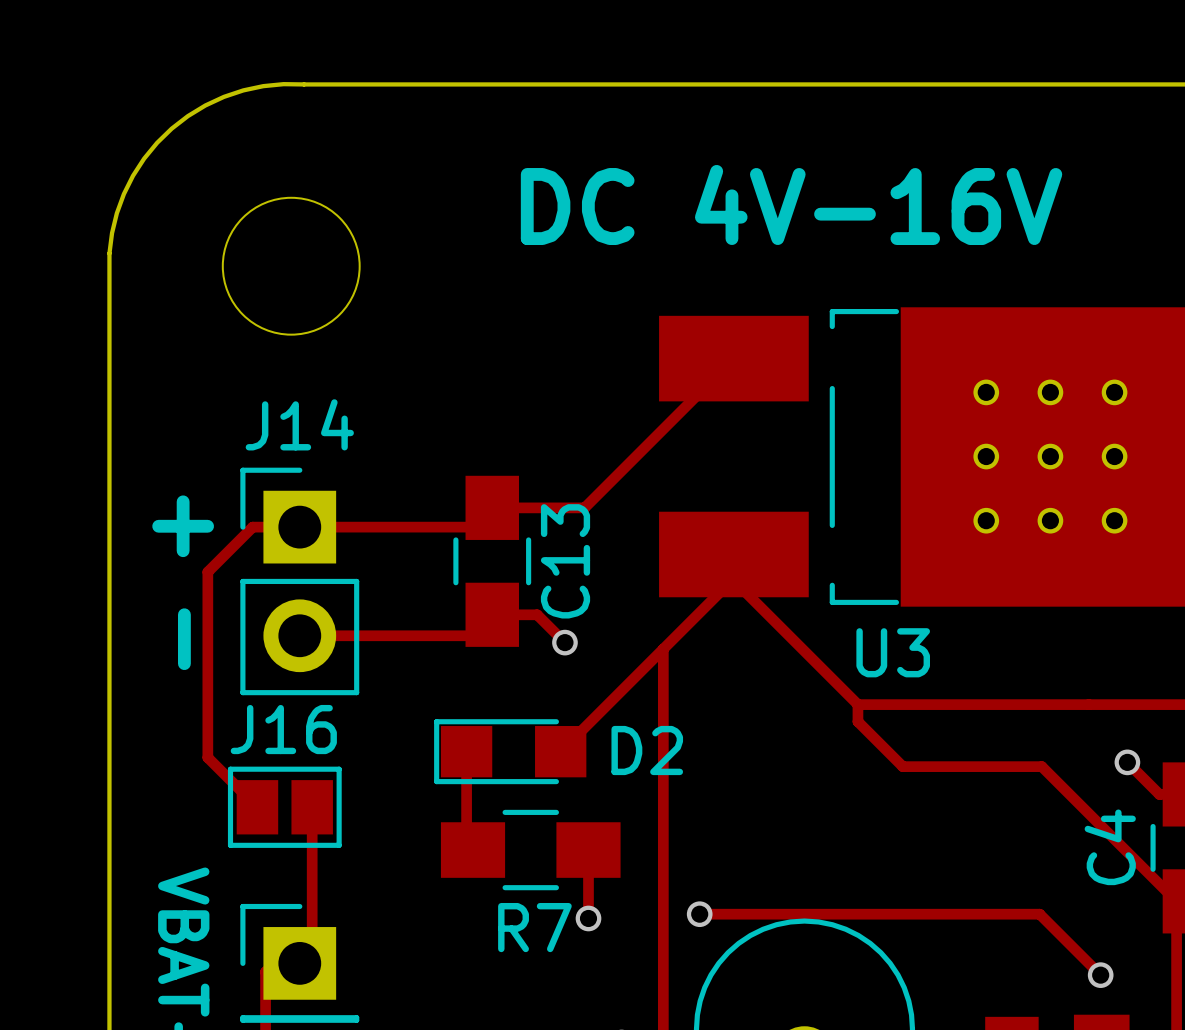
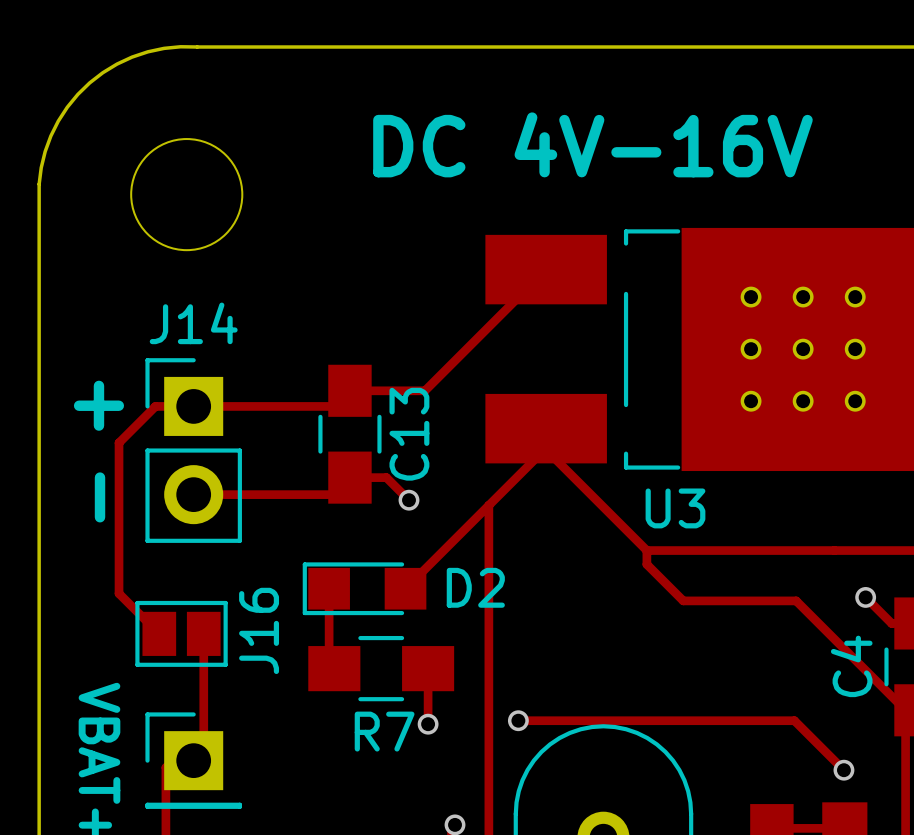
J16 name rotation: 0° (283, 729) -> 90° counterclockwise (259, 630)

